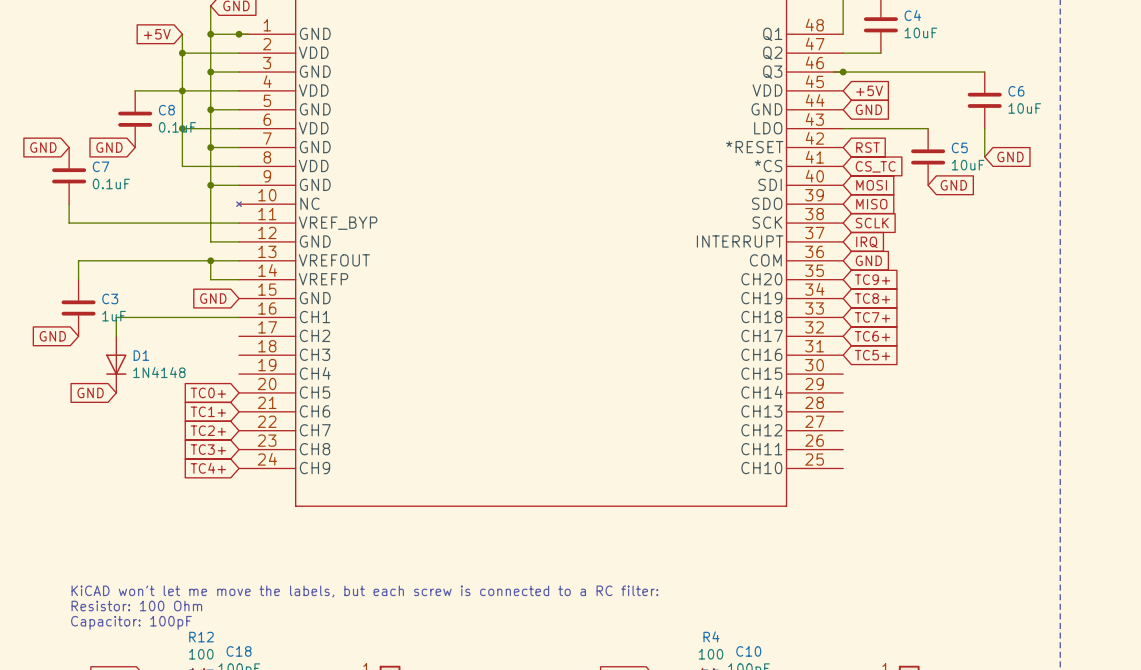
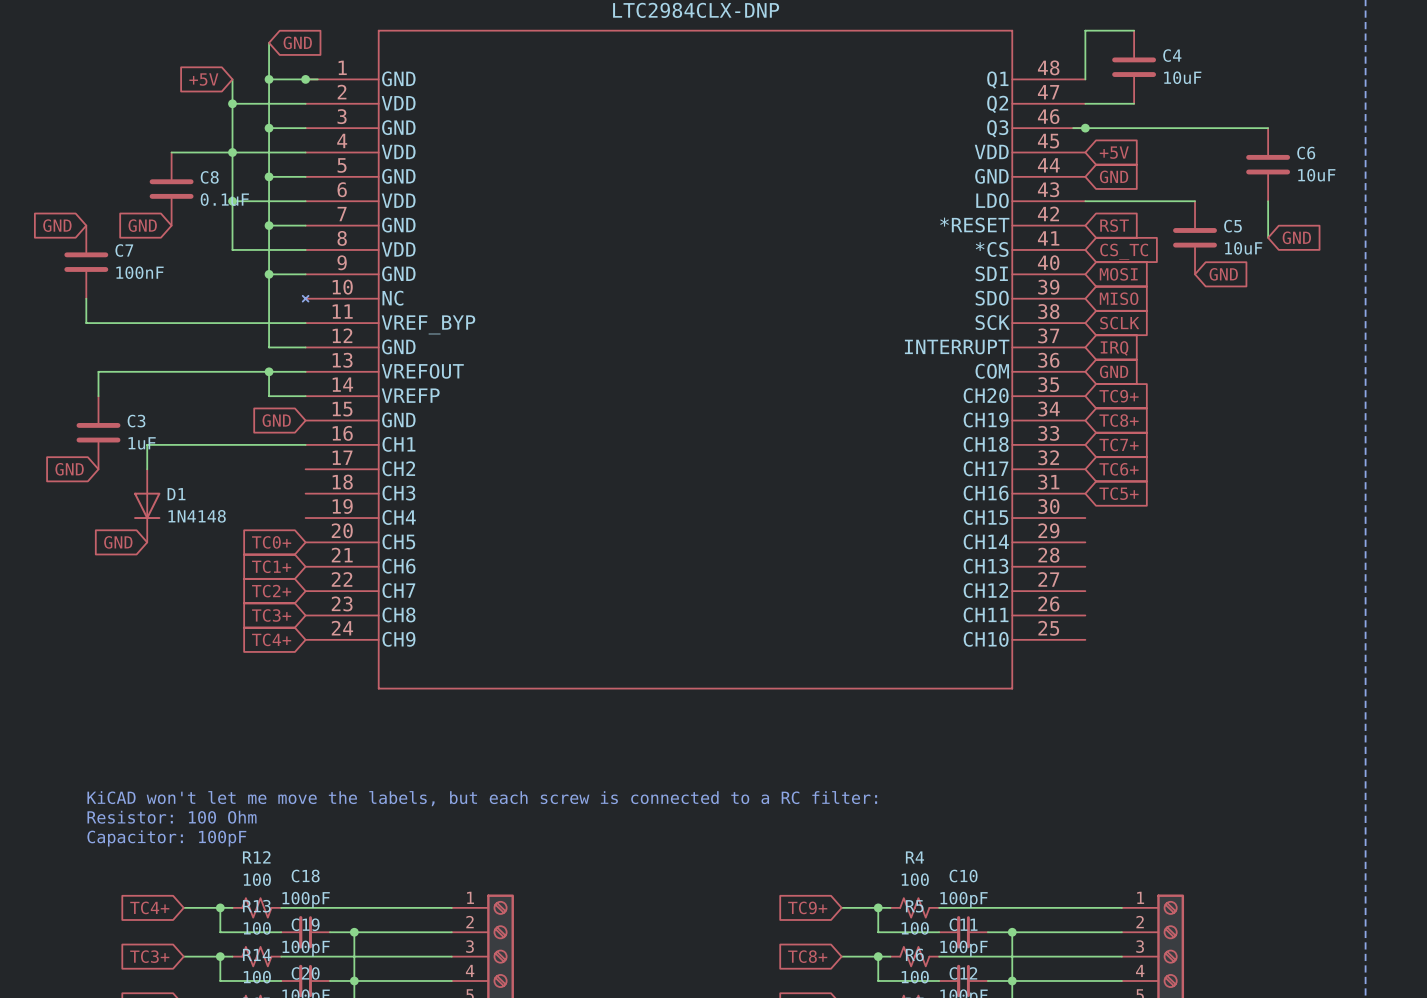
C7 value: 0.1uF (111, 183) -> 100nF (139, 272)

